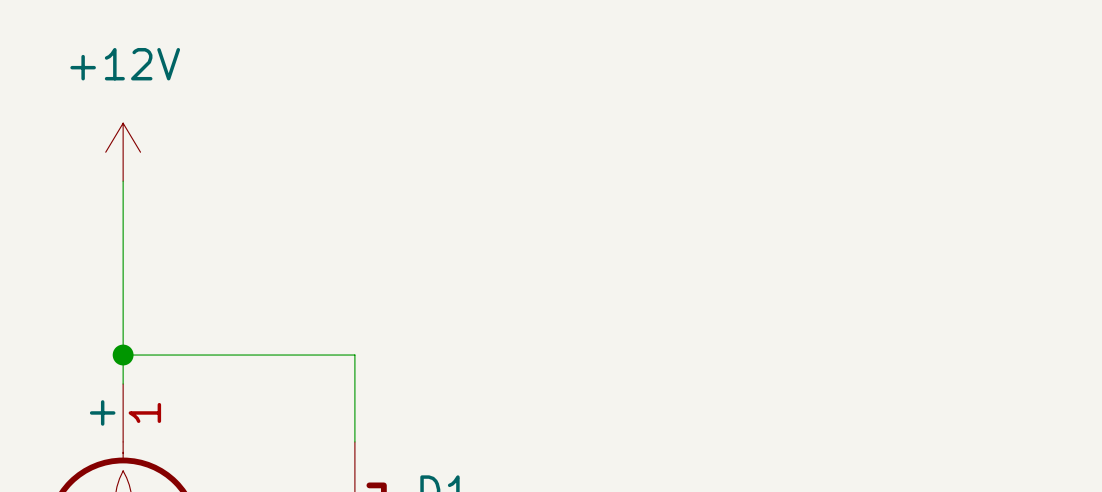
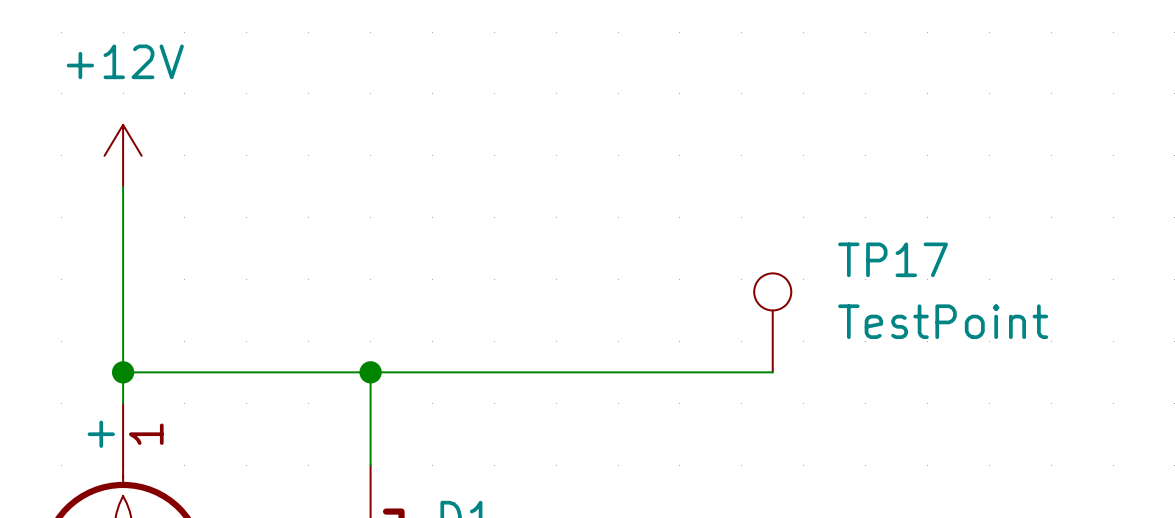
TP17: none -> TestPoint (772, 322)
wire: none -> (370, 372) (772, 372)
junction: none -> (370, 372)

